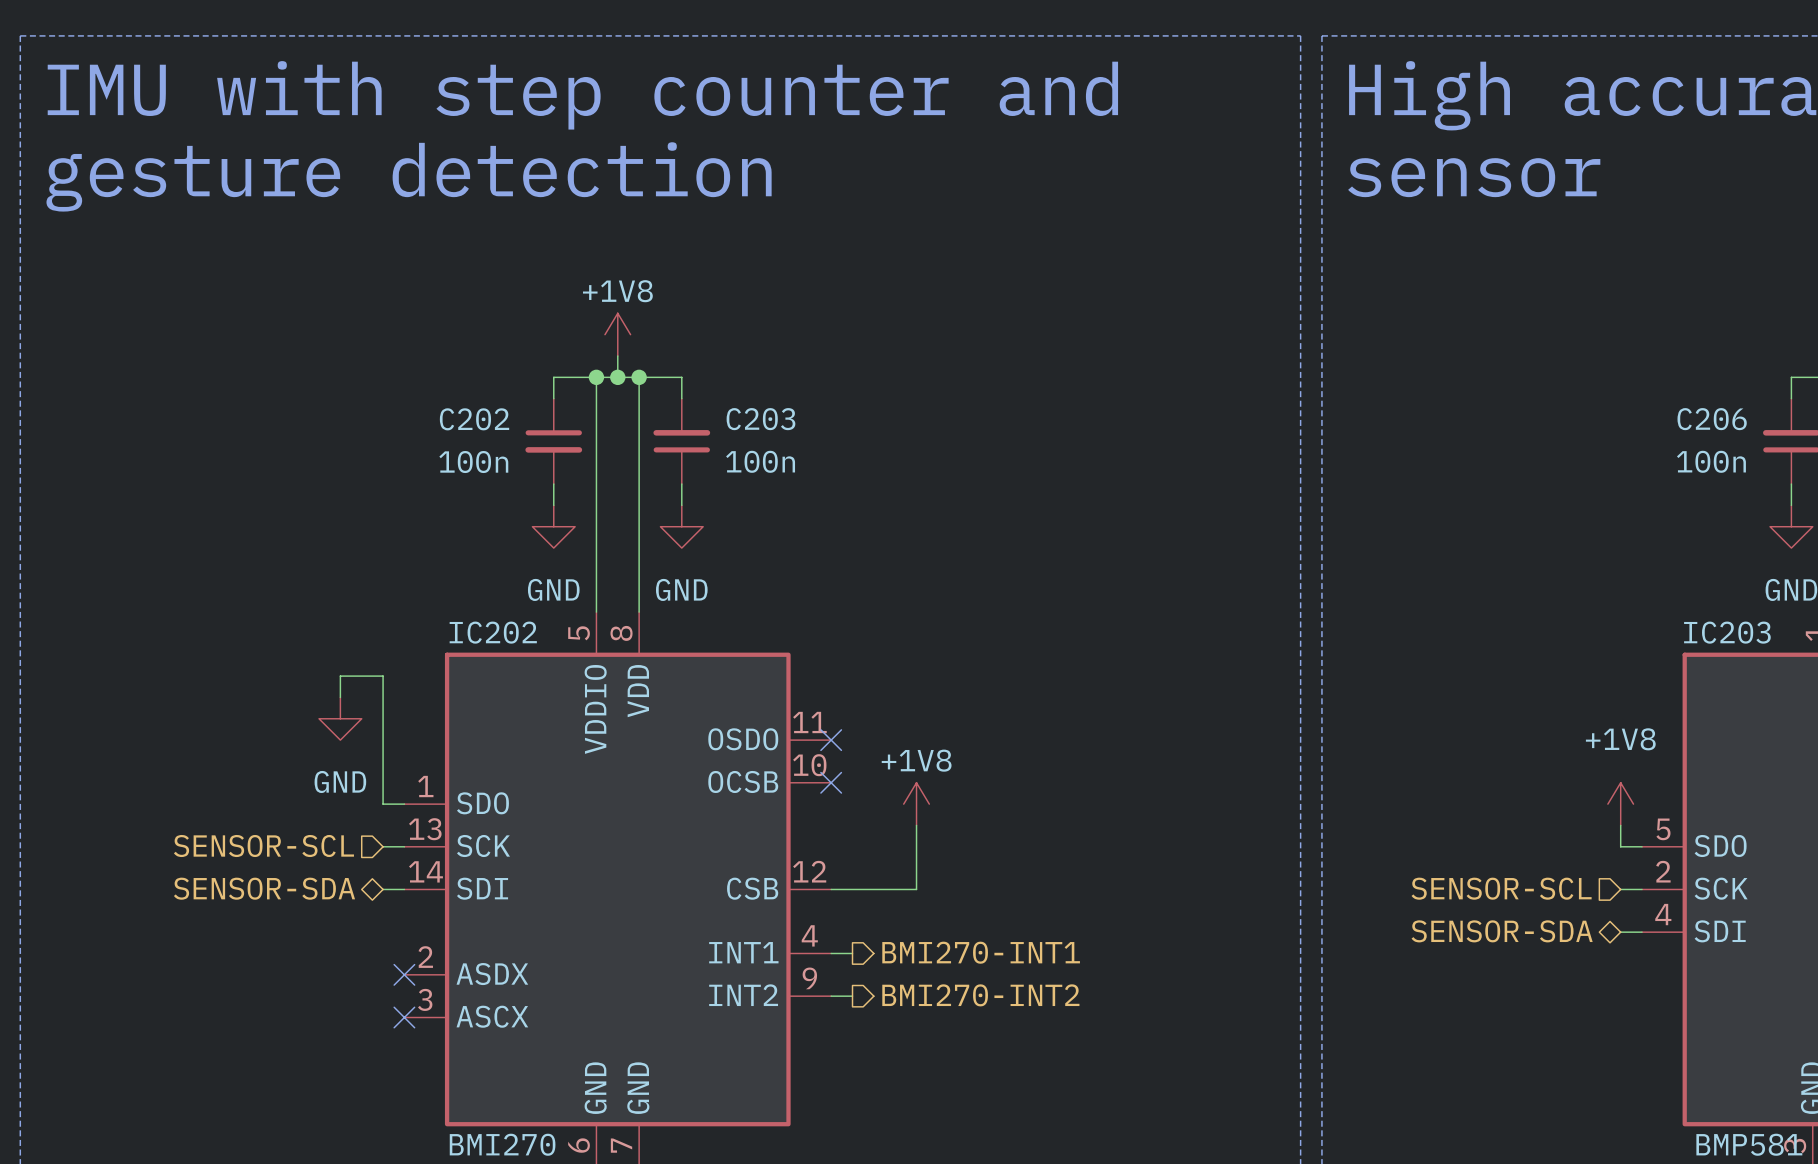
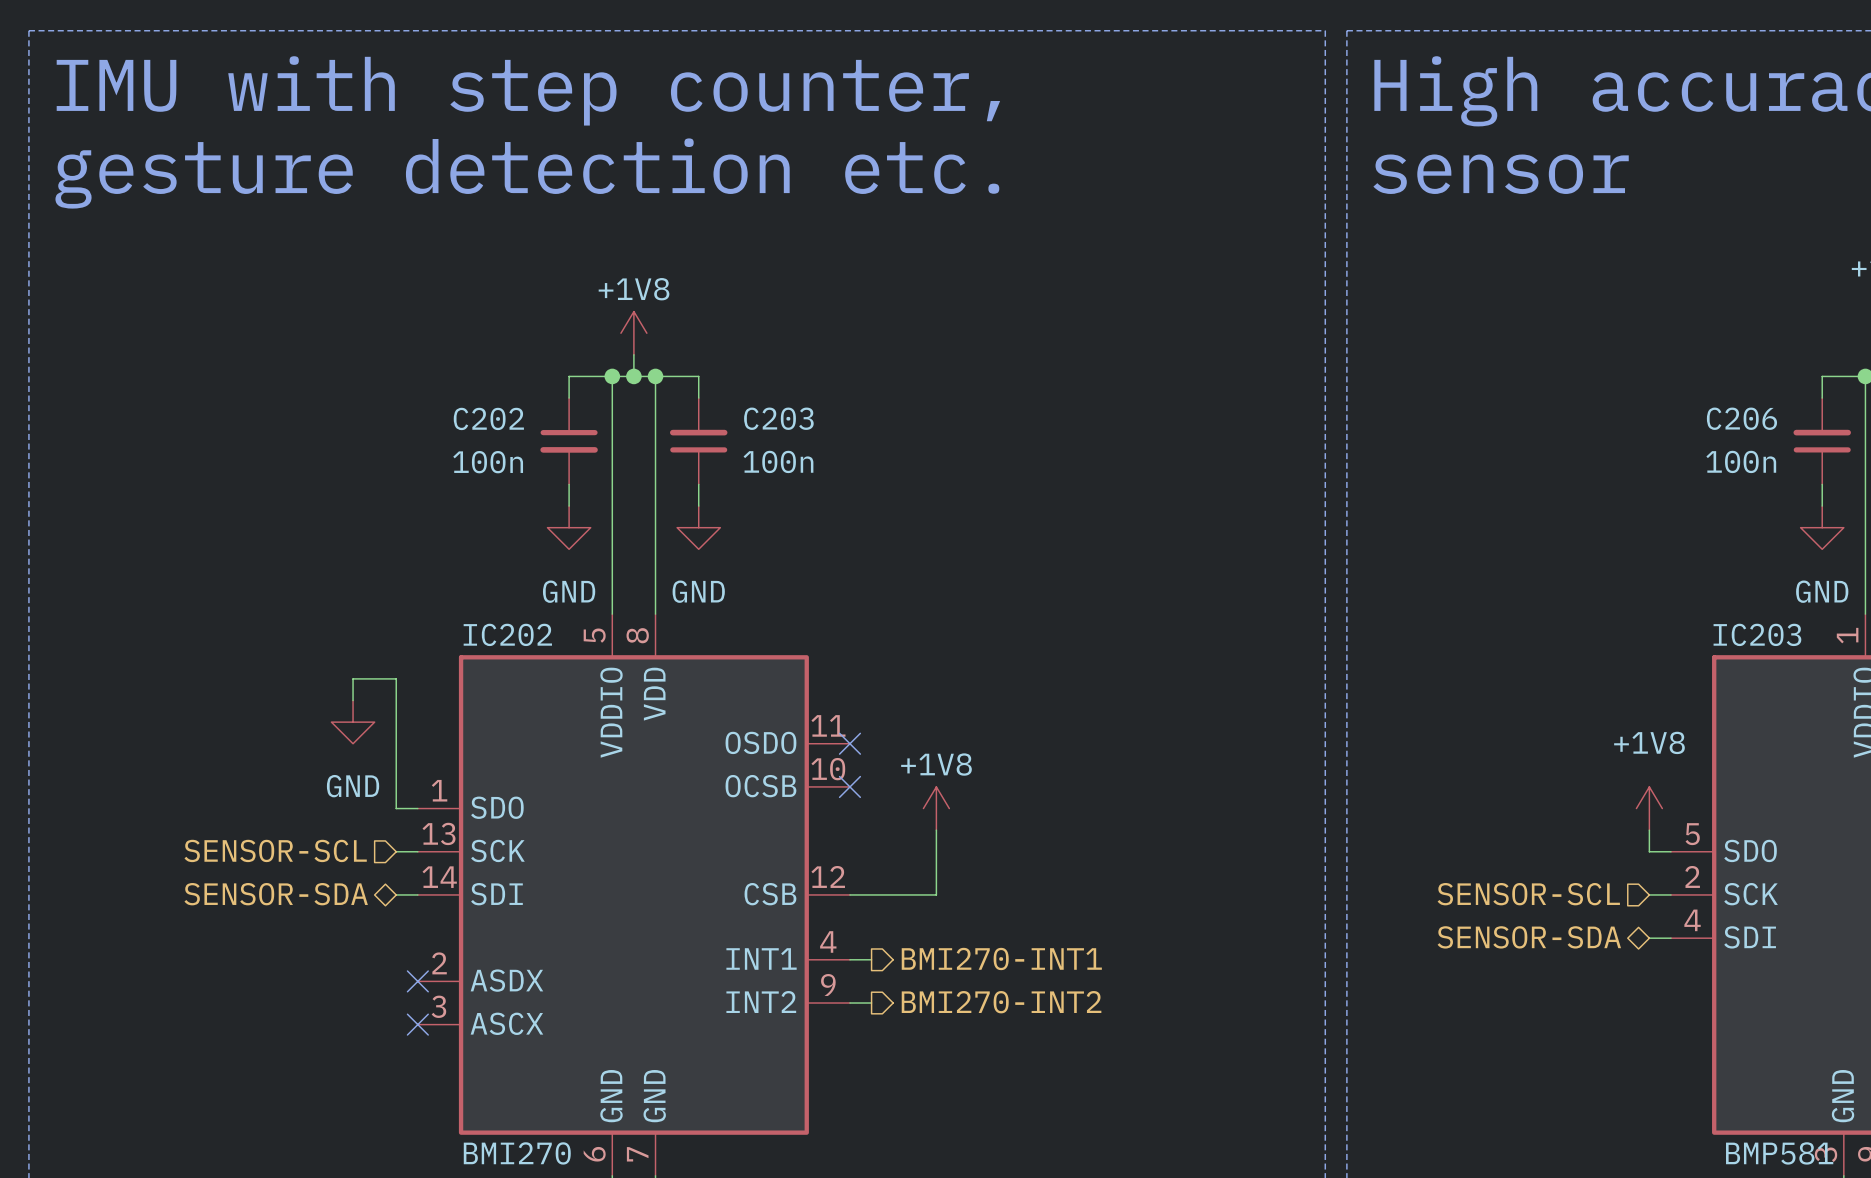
text: IMU with step counter and (582, 95) -> IMU with step counter, (528, 90)
text: gesture detection (409, 176) -> gesture detection etc. (527, 173)

